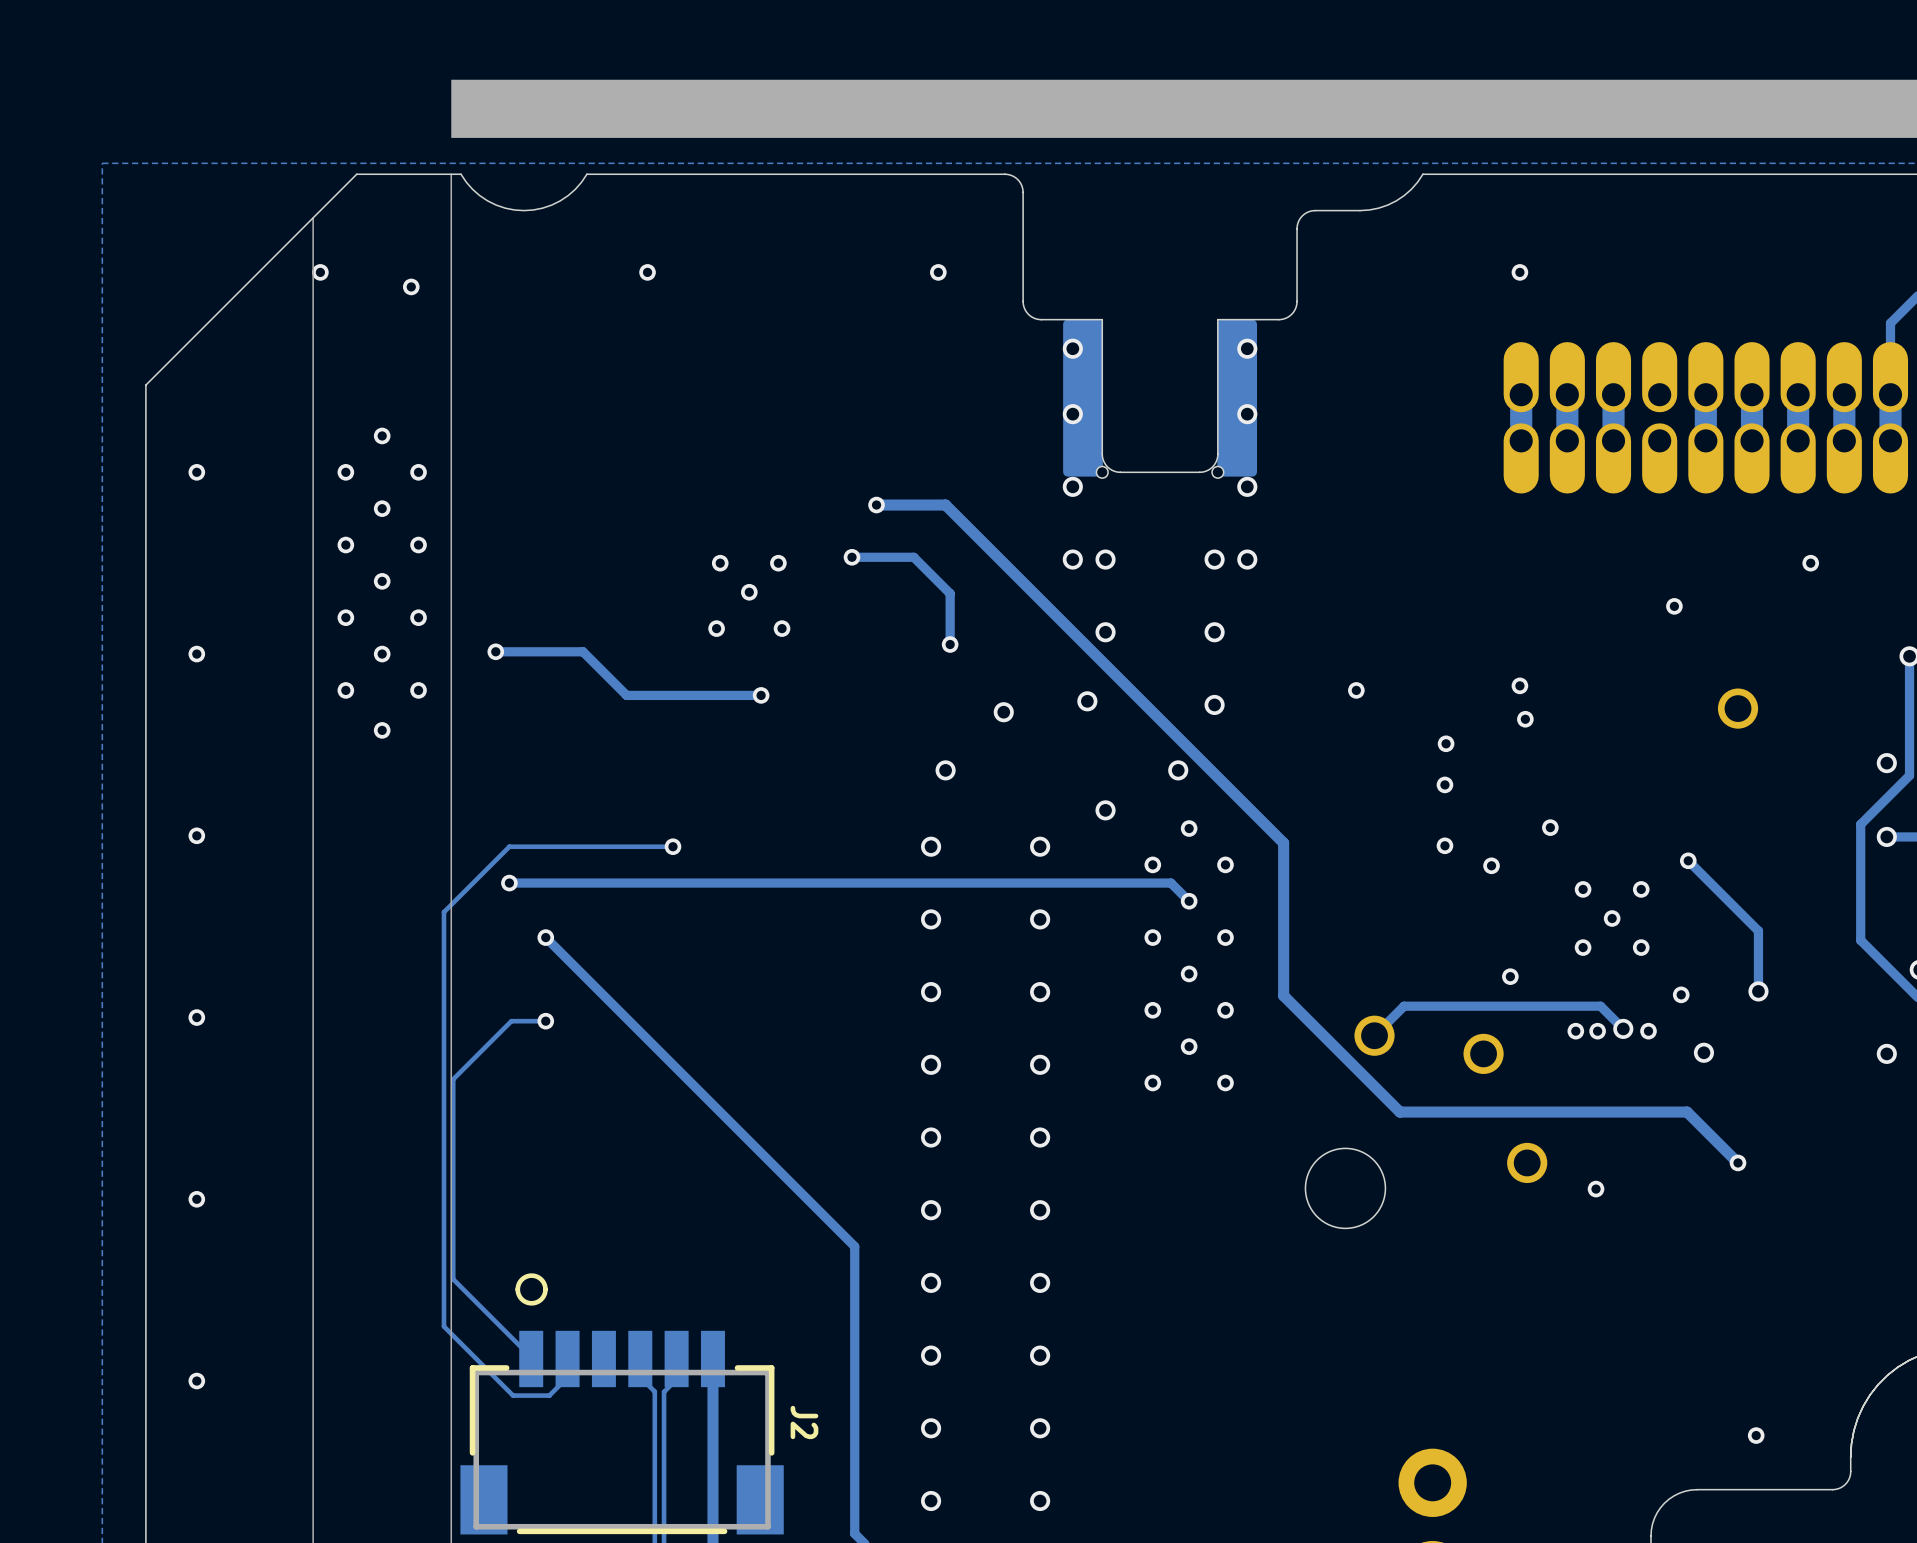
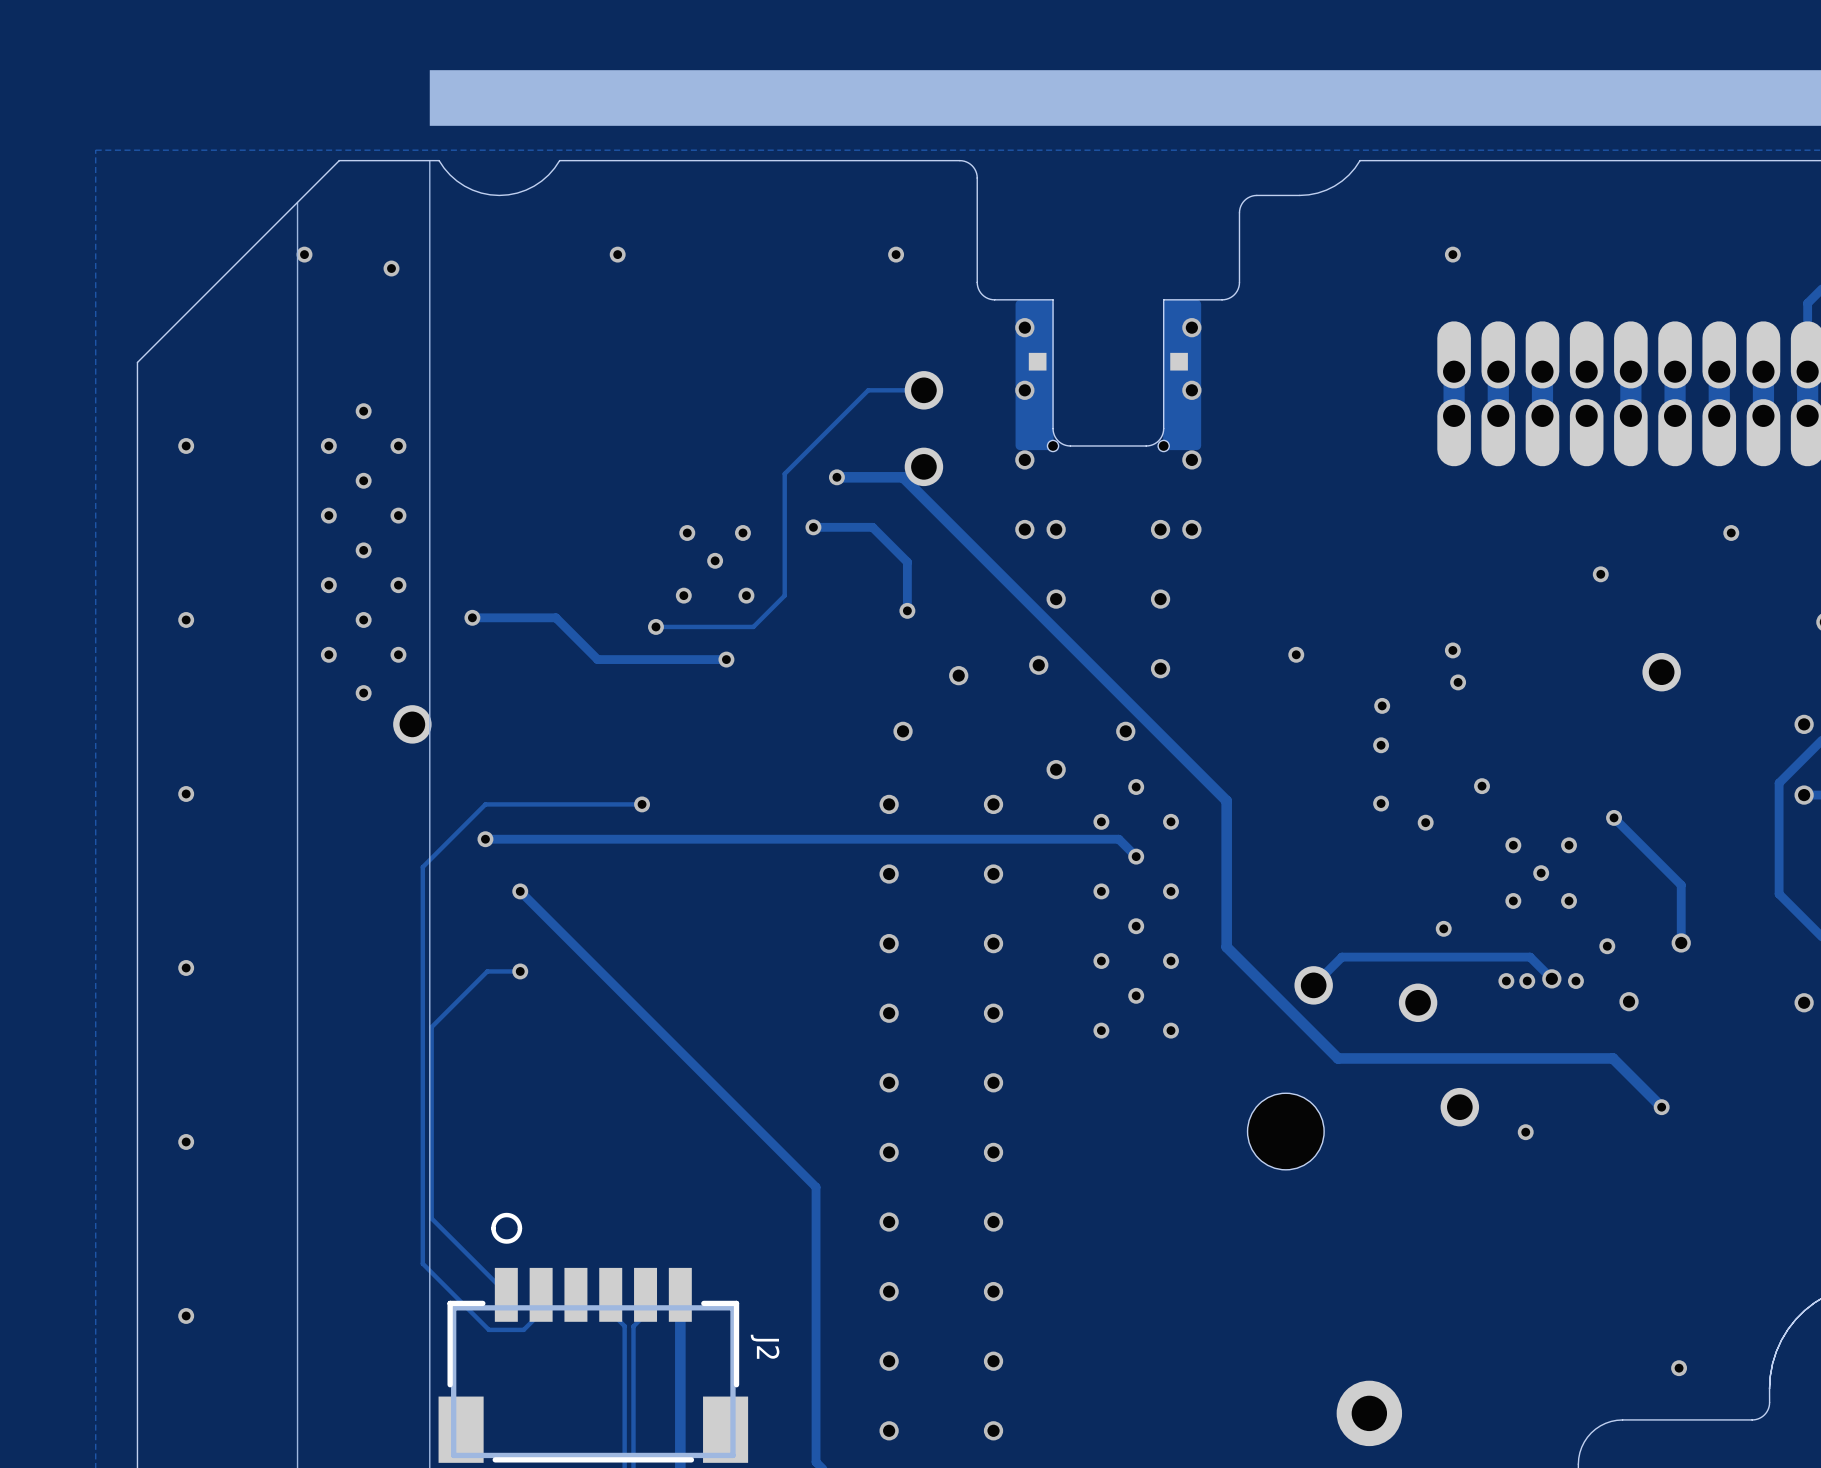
track: none -> (923, 390) (868, 390) (784, 473) (784, 595) (753, 626) (655, 626)
part: none -> (923, 390)
part: none -> (923, 466)
via: none -> (655, 626)
part: none -> (412, 724)

